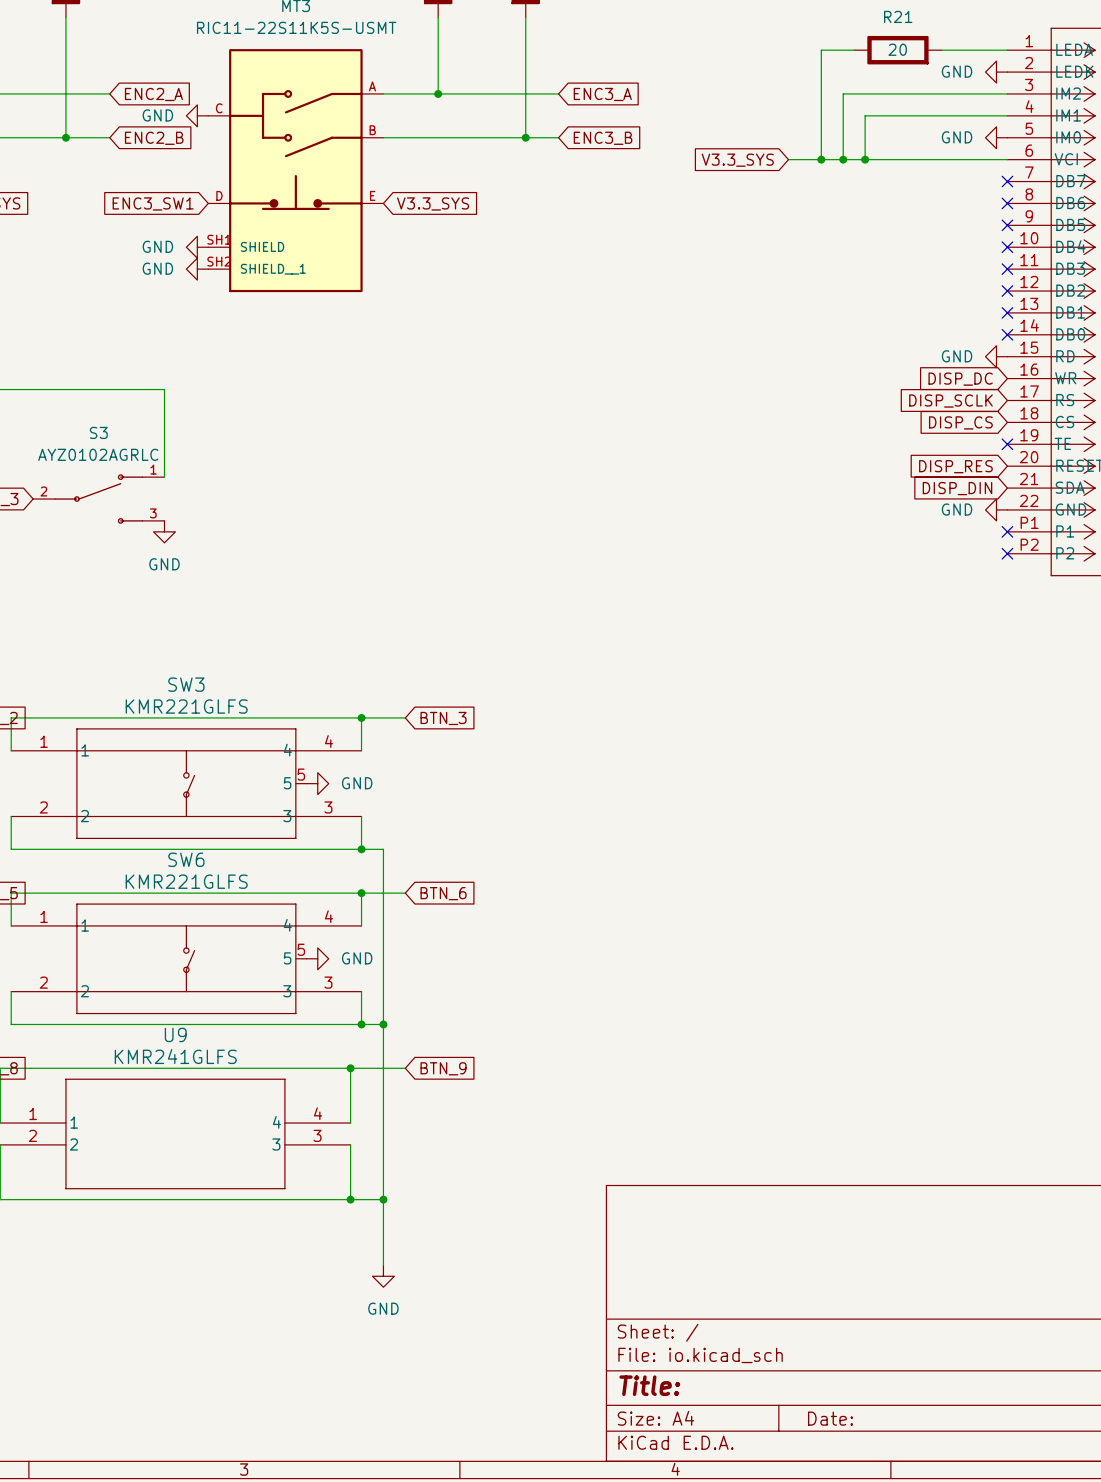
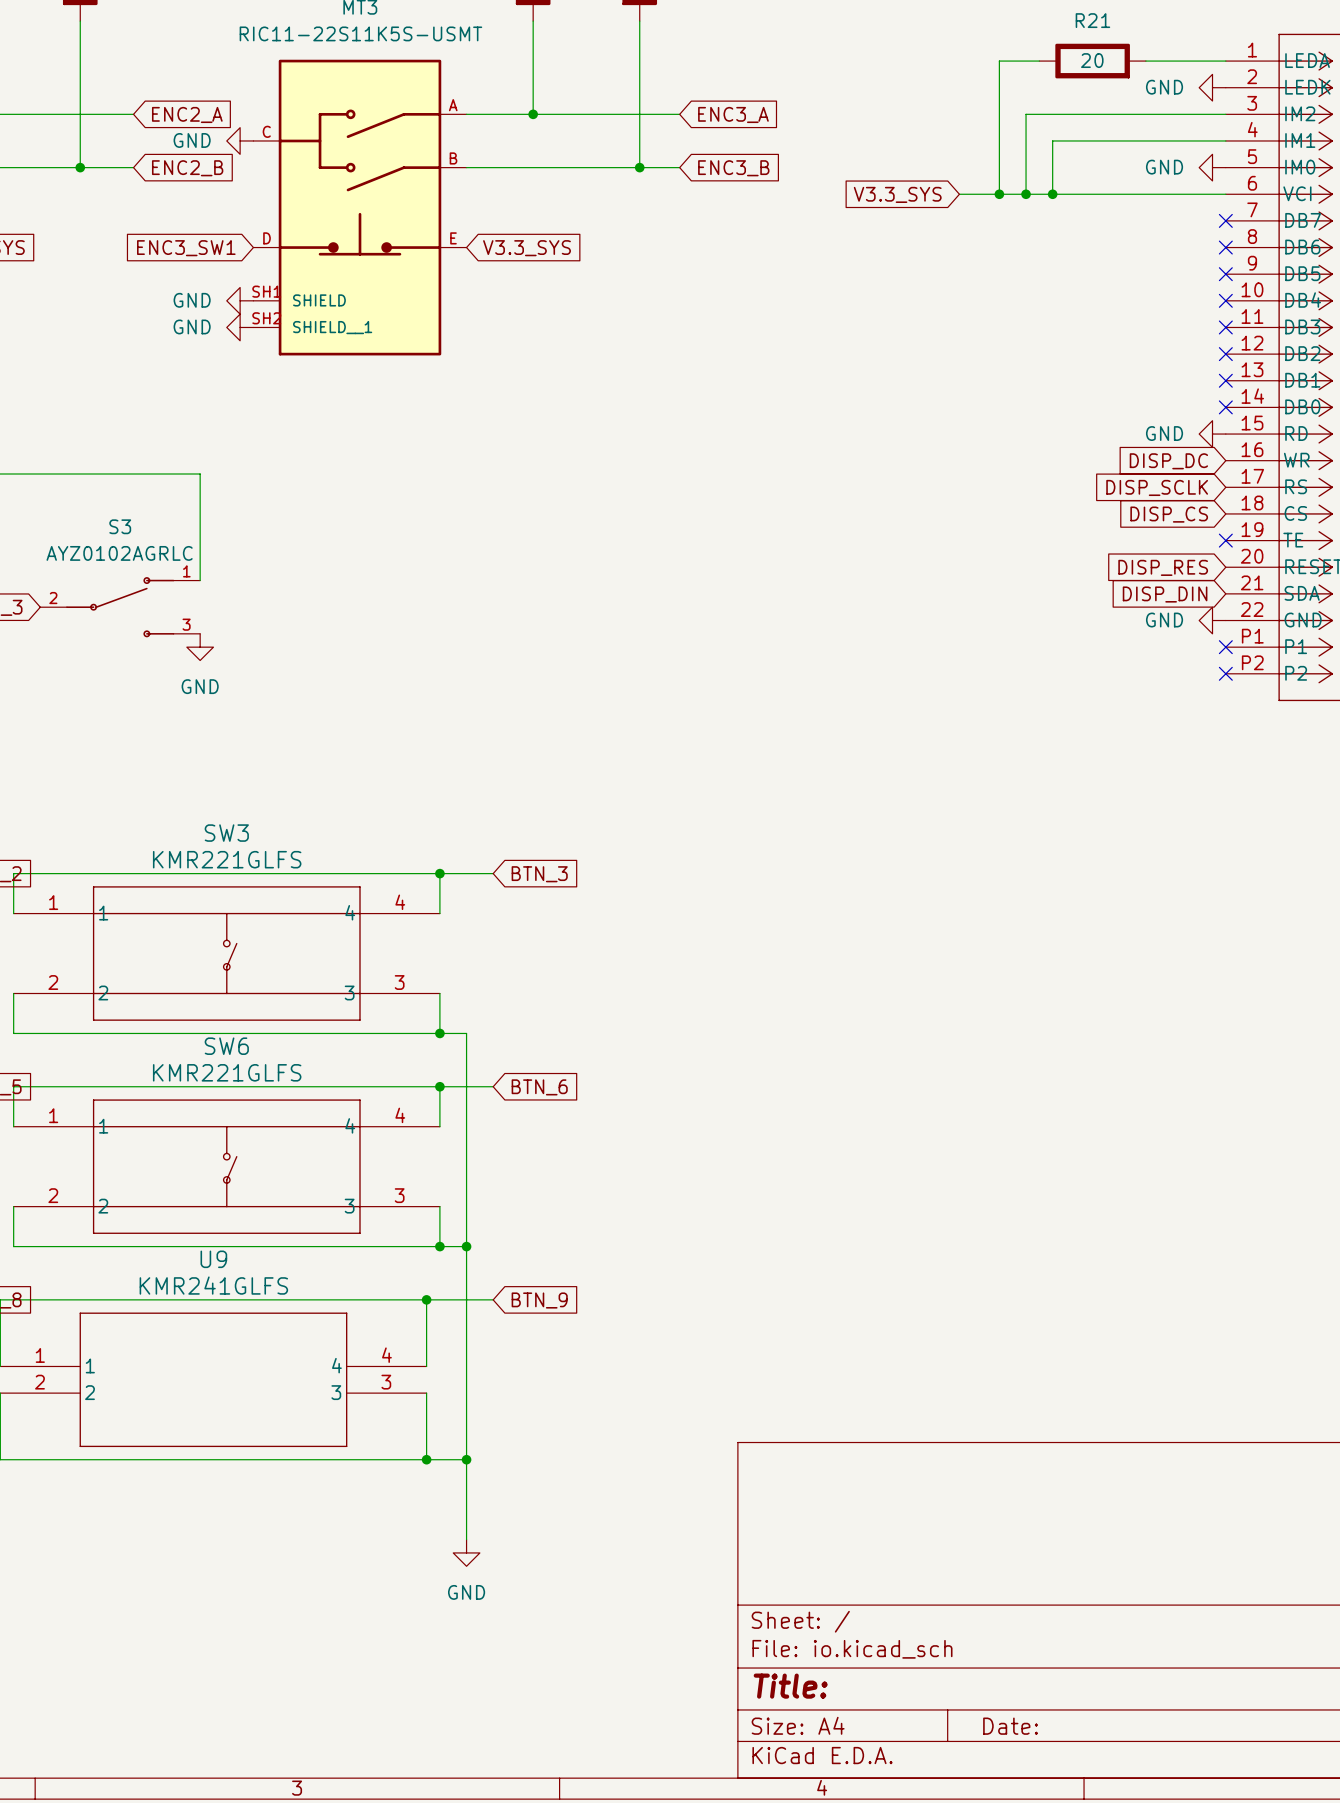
SW3 symbol: [11, 728, 362, 839] -> [13, 886, 440, 1021]
power symbol: GND (317, 783) -> none
SW6 symbol: [11, 903, 362, 1015] -> [13, 1099, 440, 1234]
power symbol: GND (317, 958) -> none

